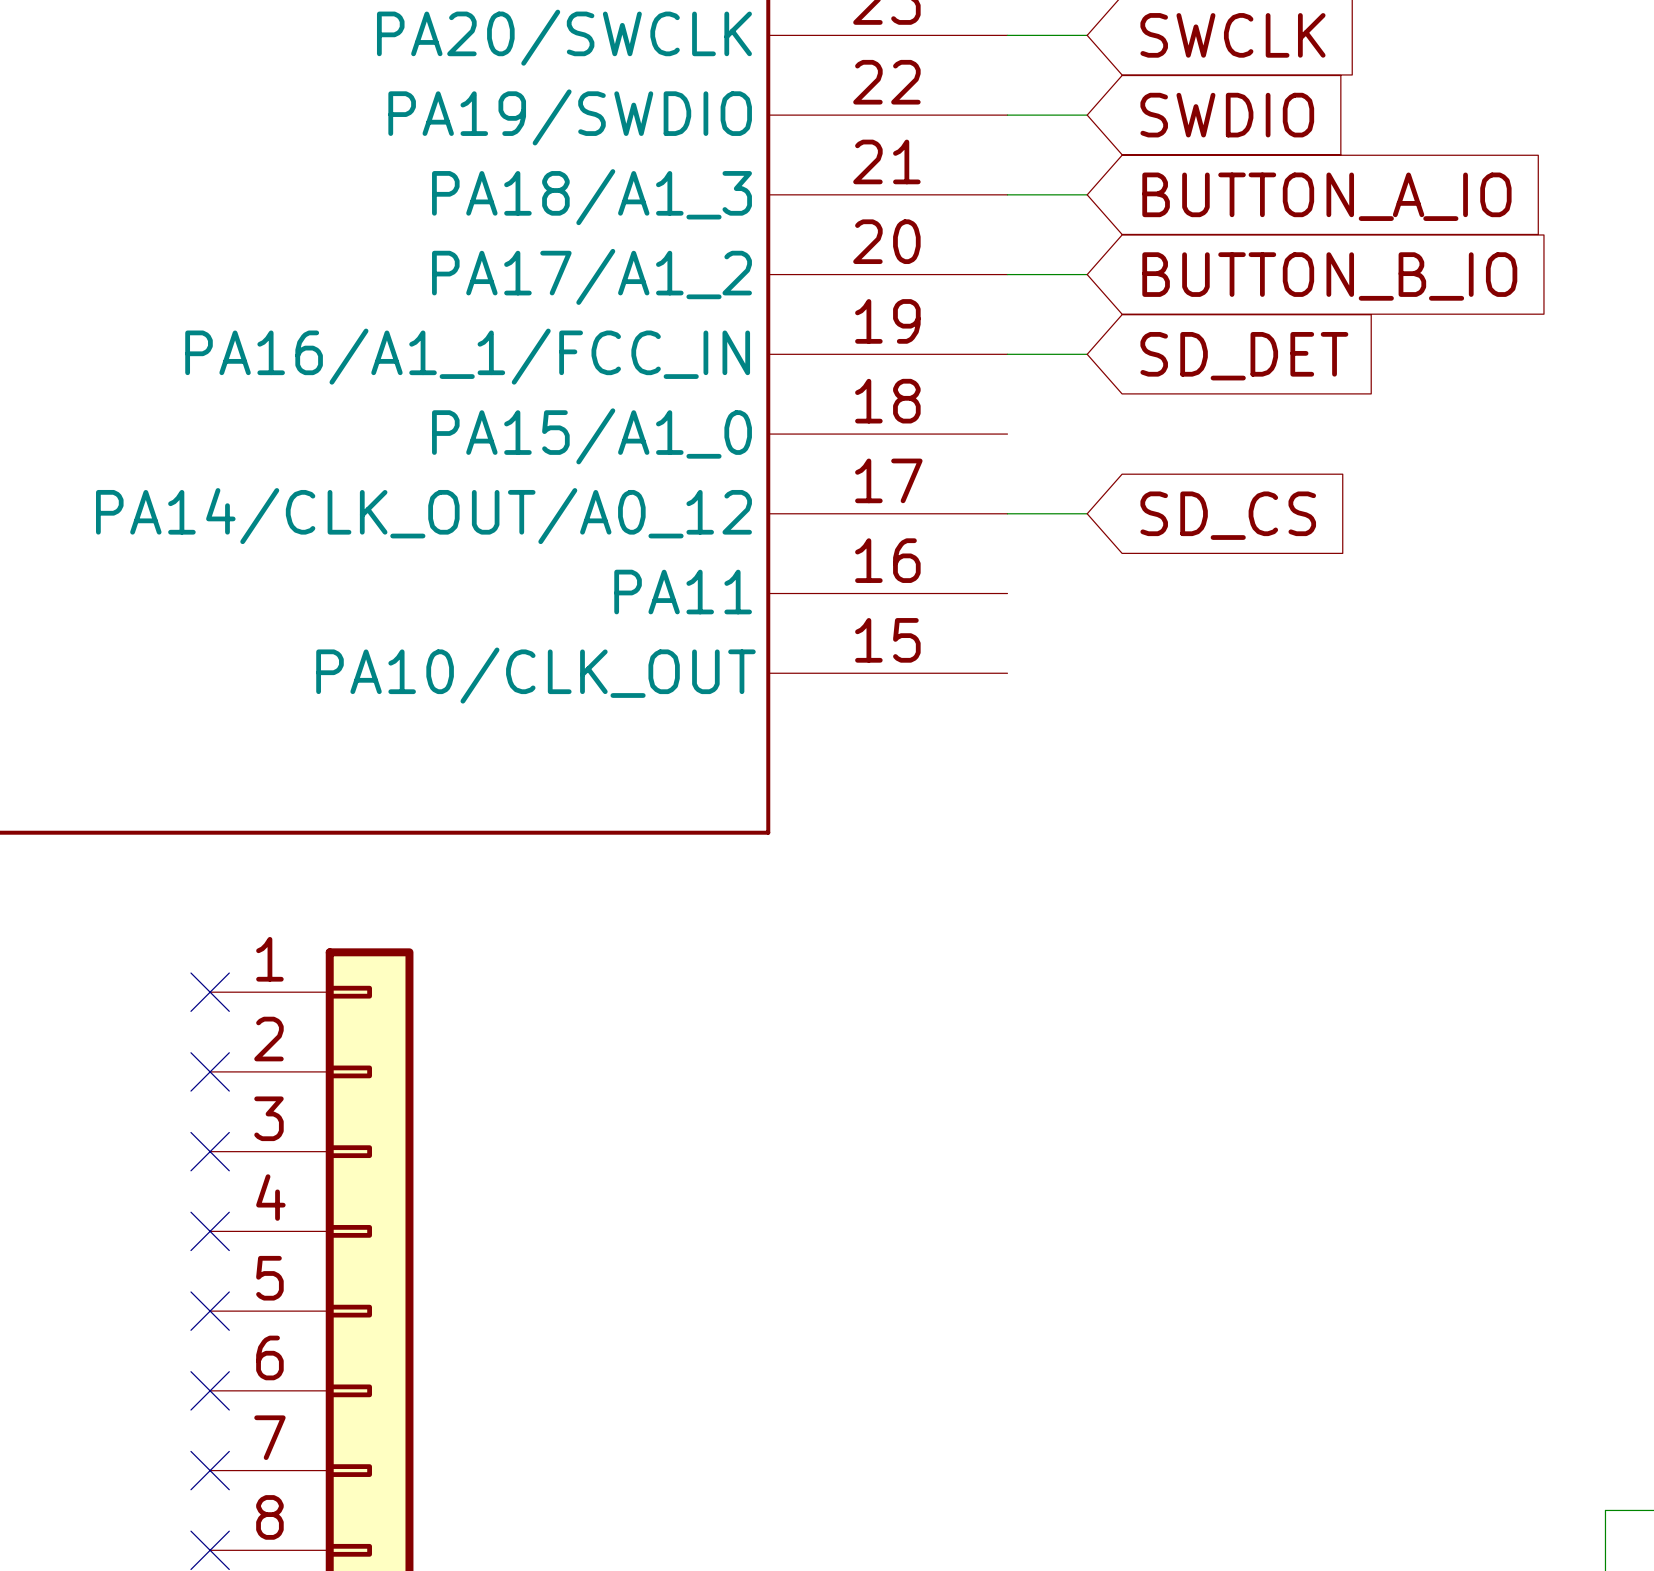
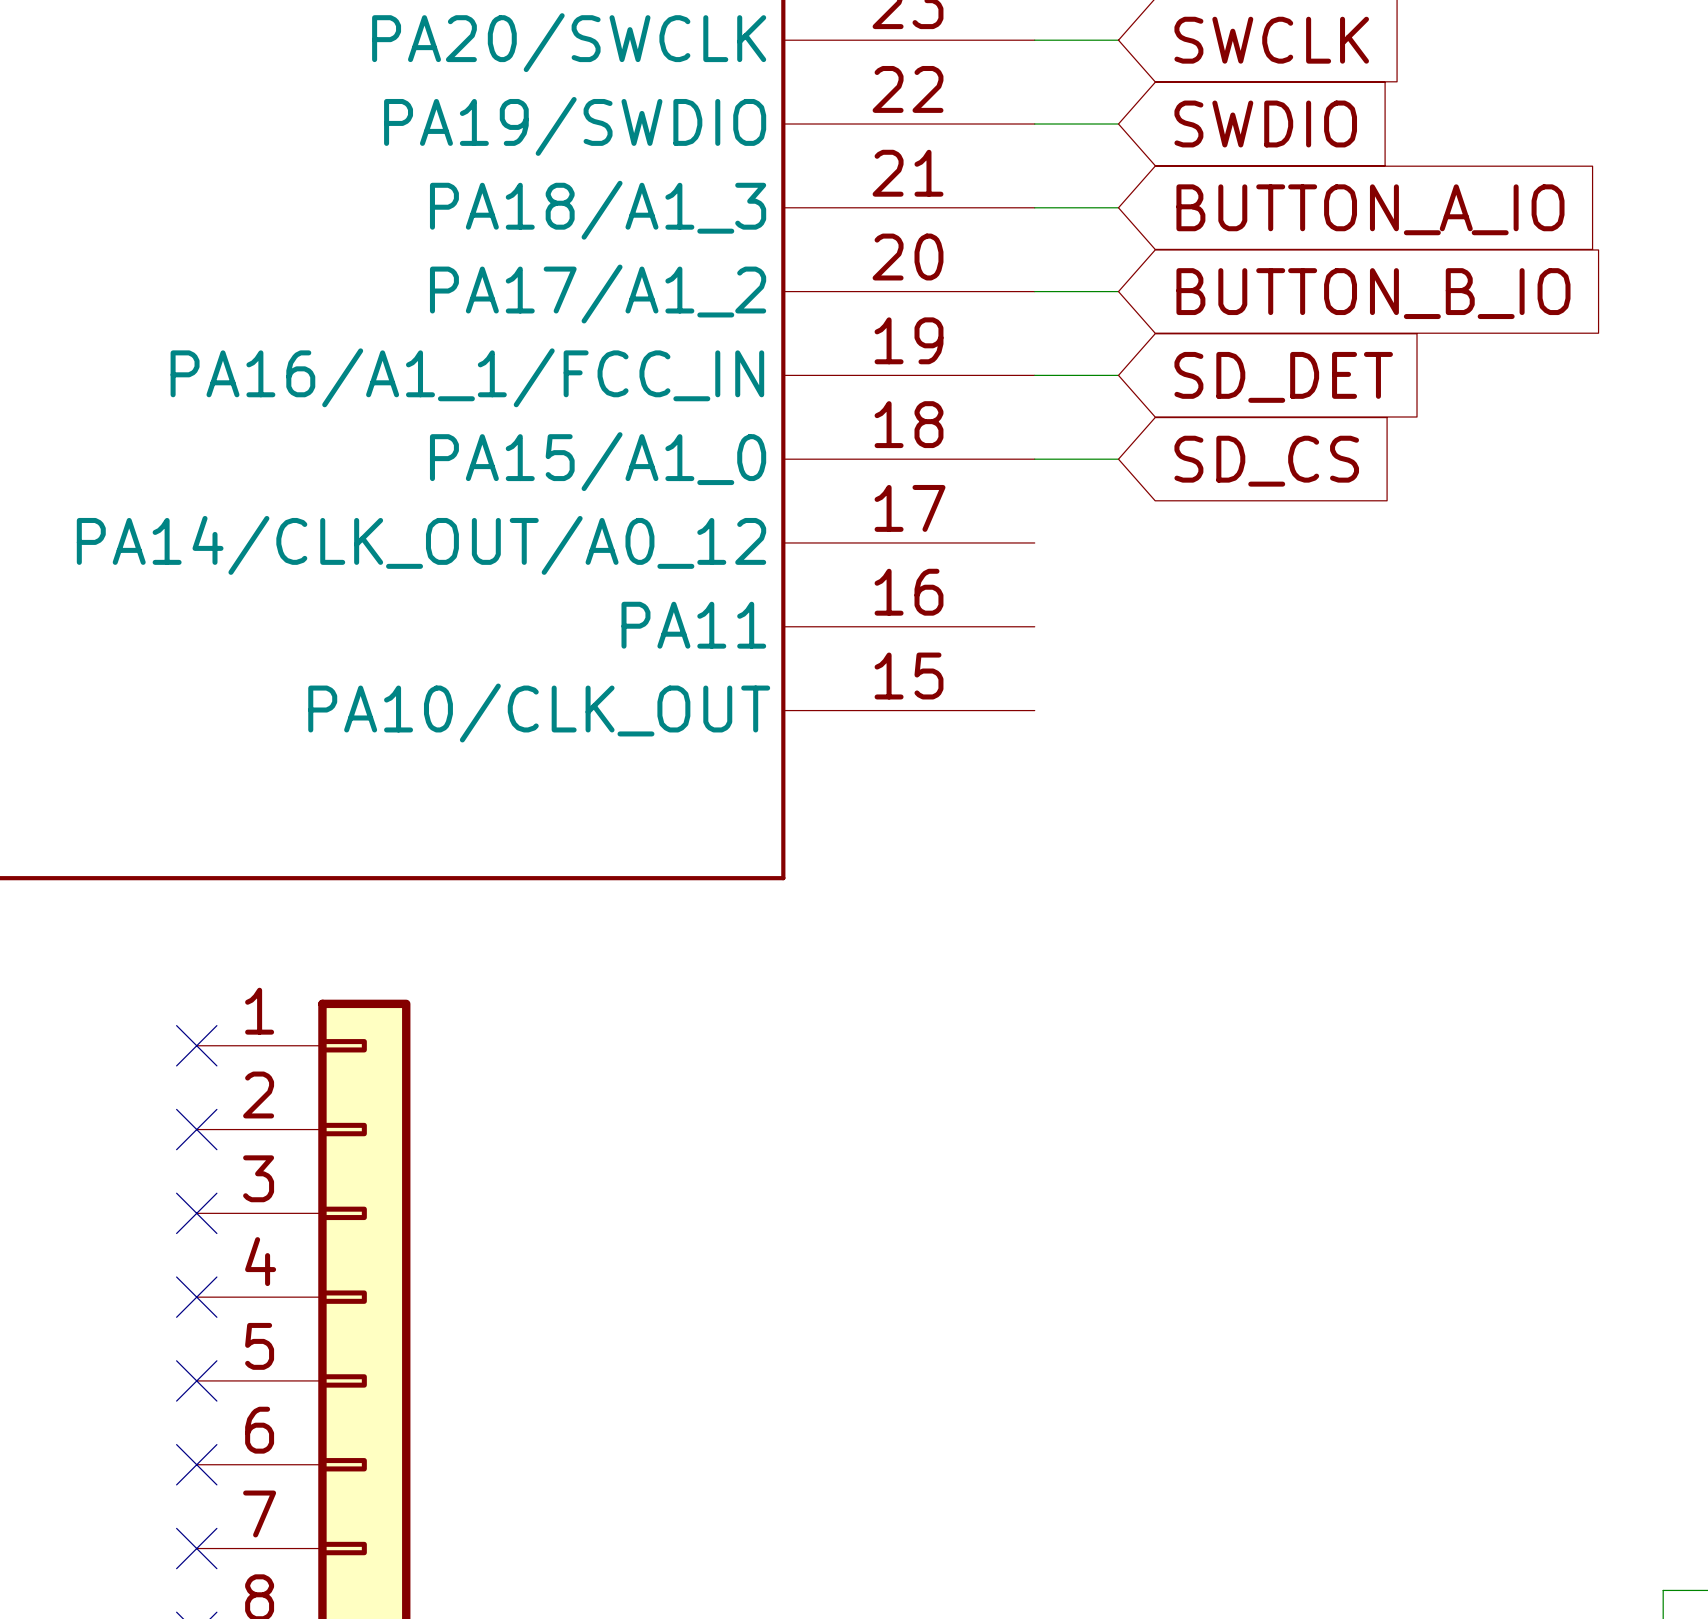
wire: (1007, 513) (1087, 513) -> (1034, 459) (1118, 459)
global label position: SD_CS (1228, 515) -> SD_CS (1266, 461)

